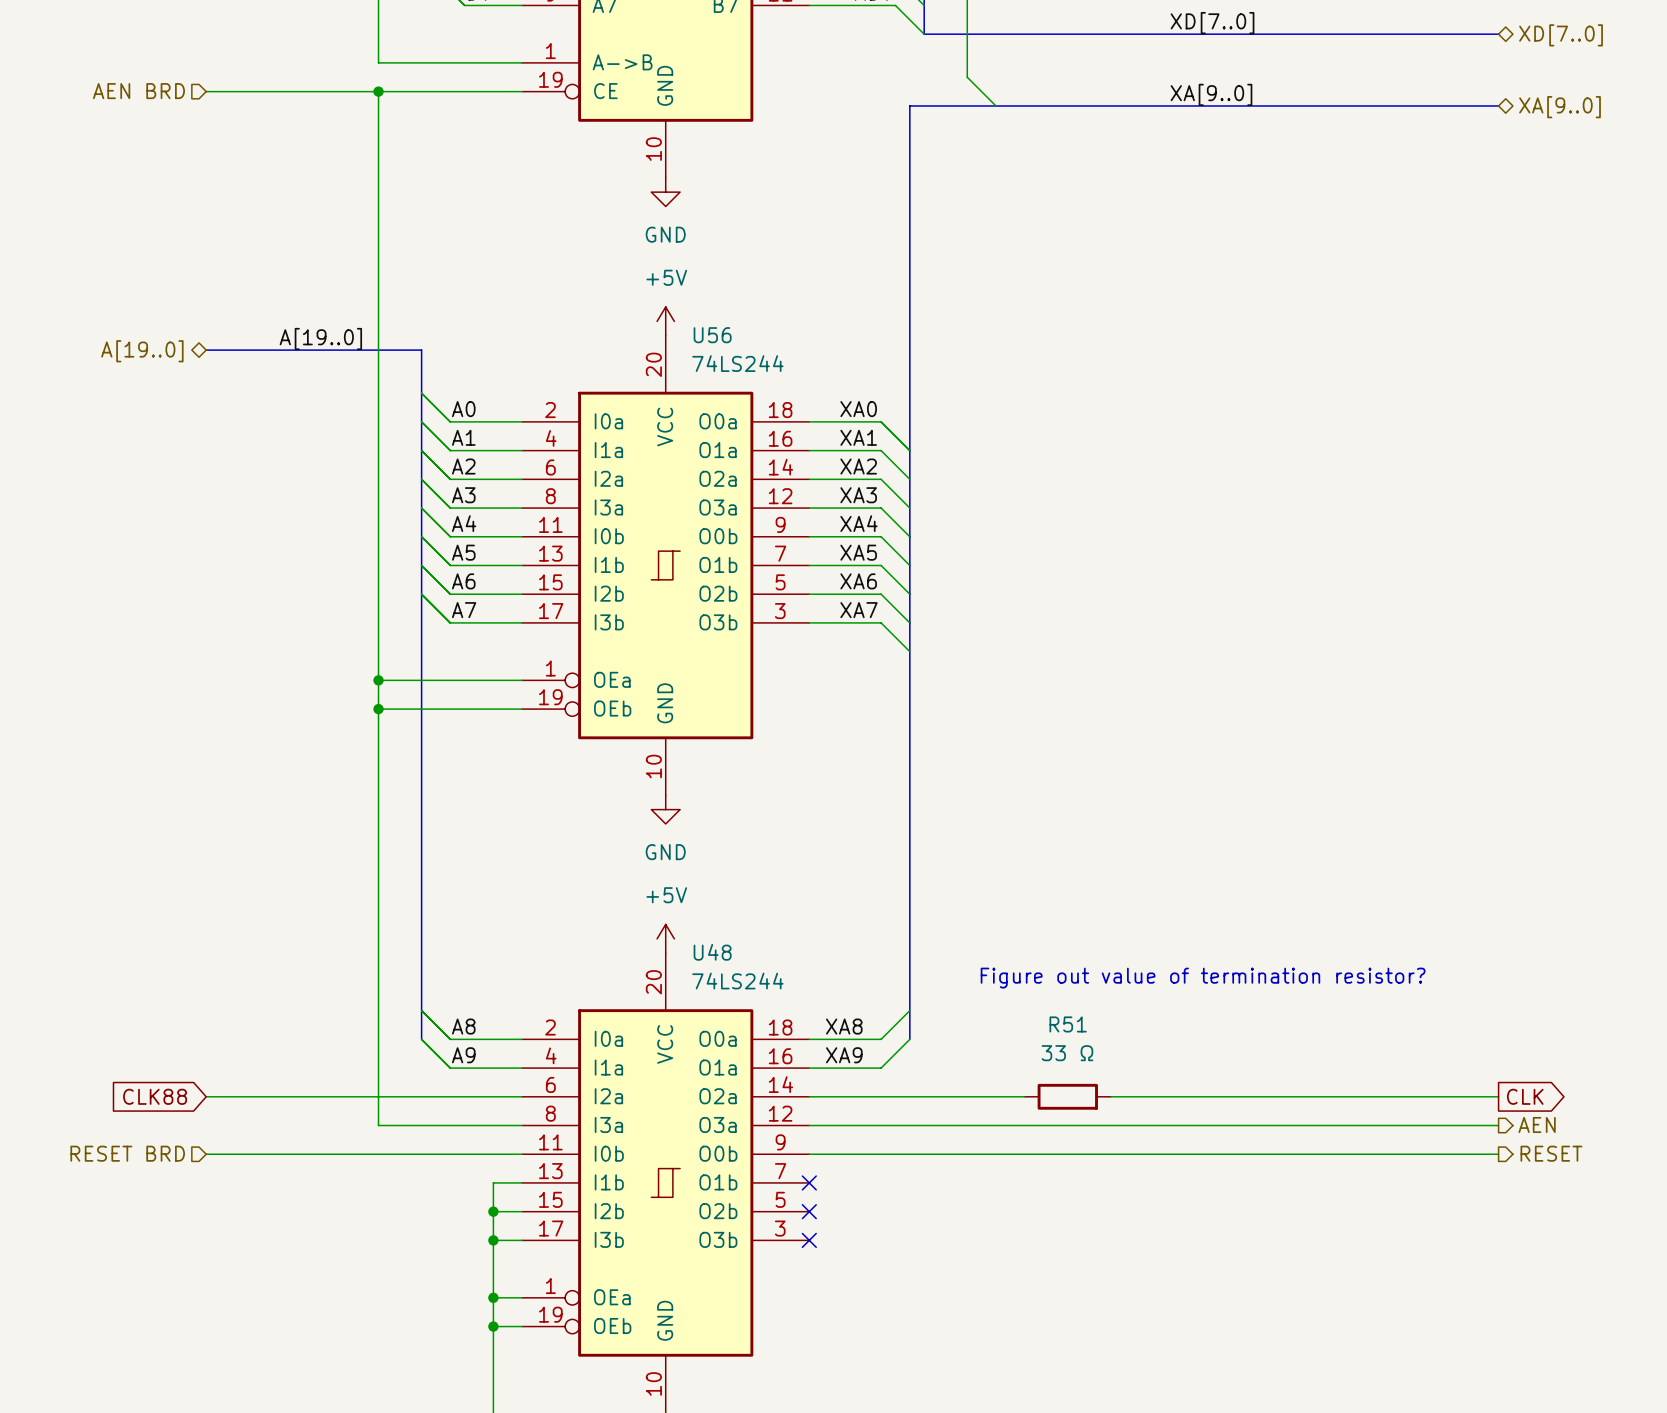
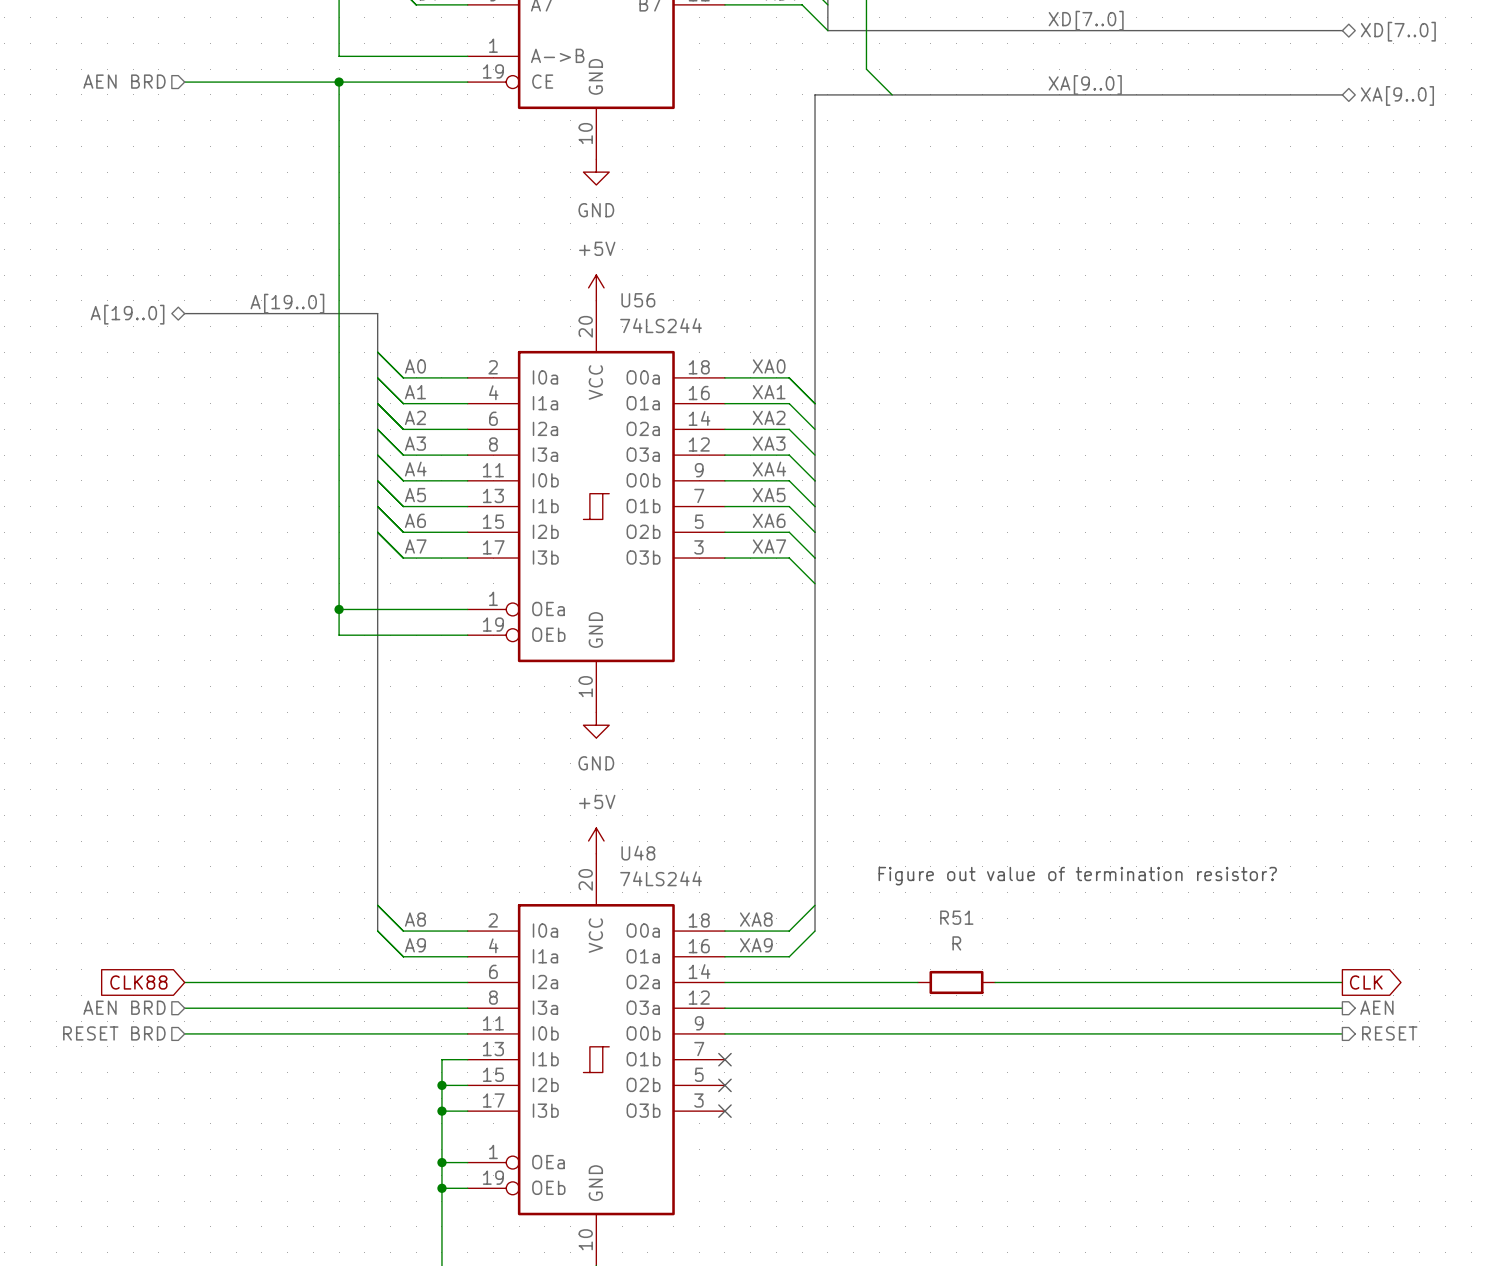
wire: (378, 709) (378, 1125) -> (184, 1008) (339, 1008)
junction: (378, 709) -> none
R51 value: 33 Ω (1067, 1053) -> R (956, 943)
hierarchical label: none -> AEN BRD (124, 1007)

